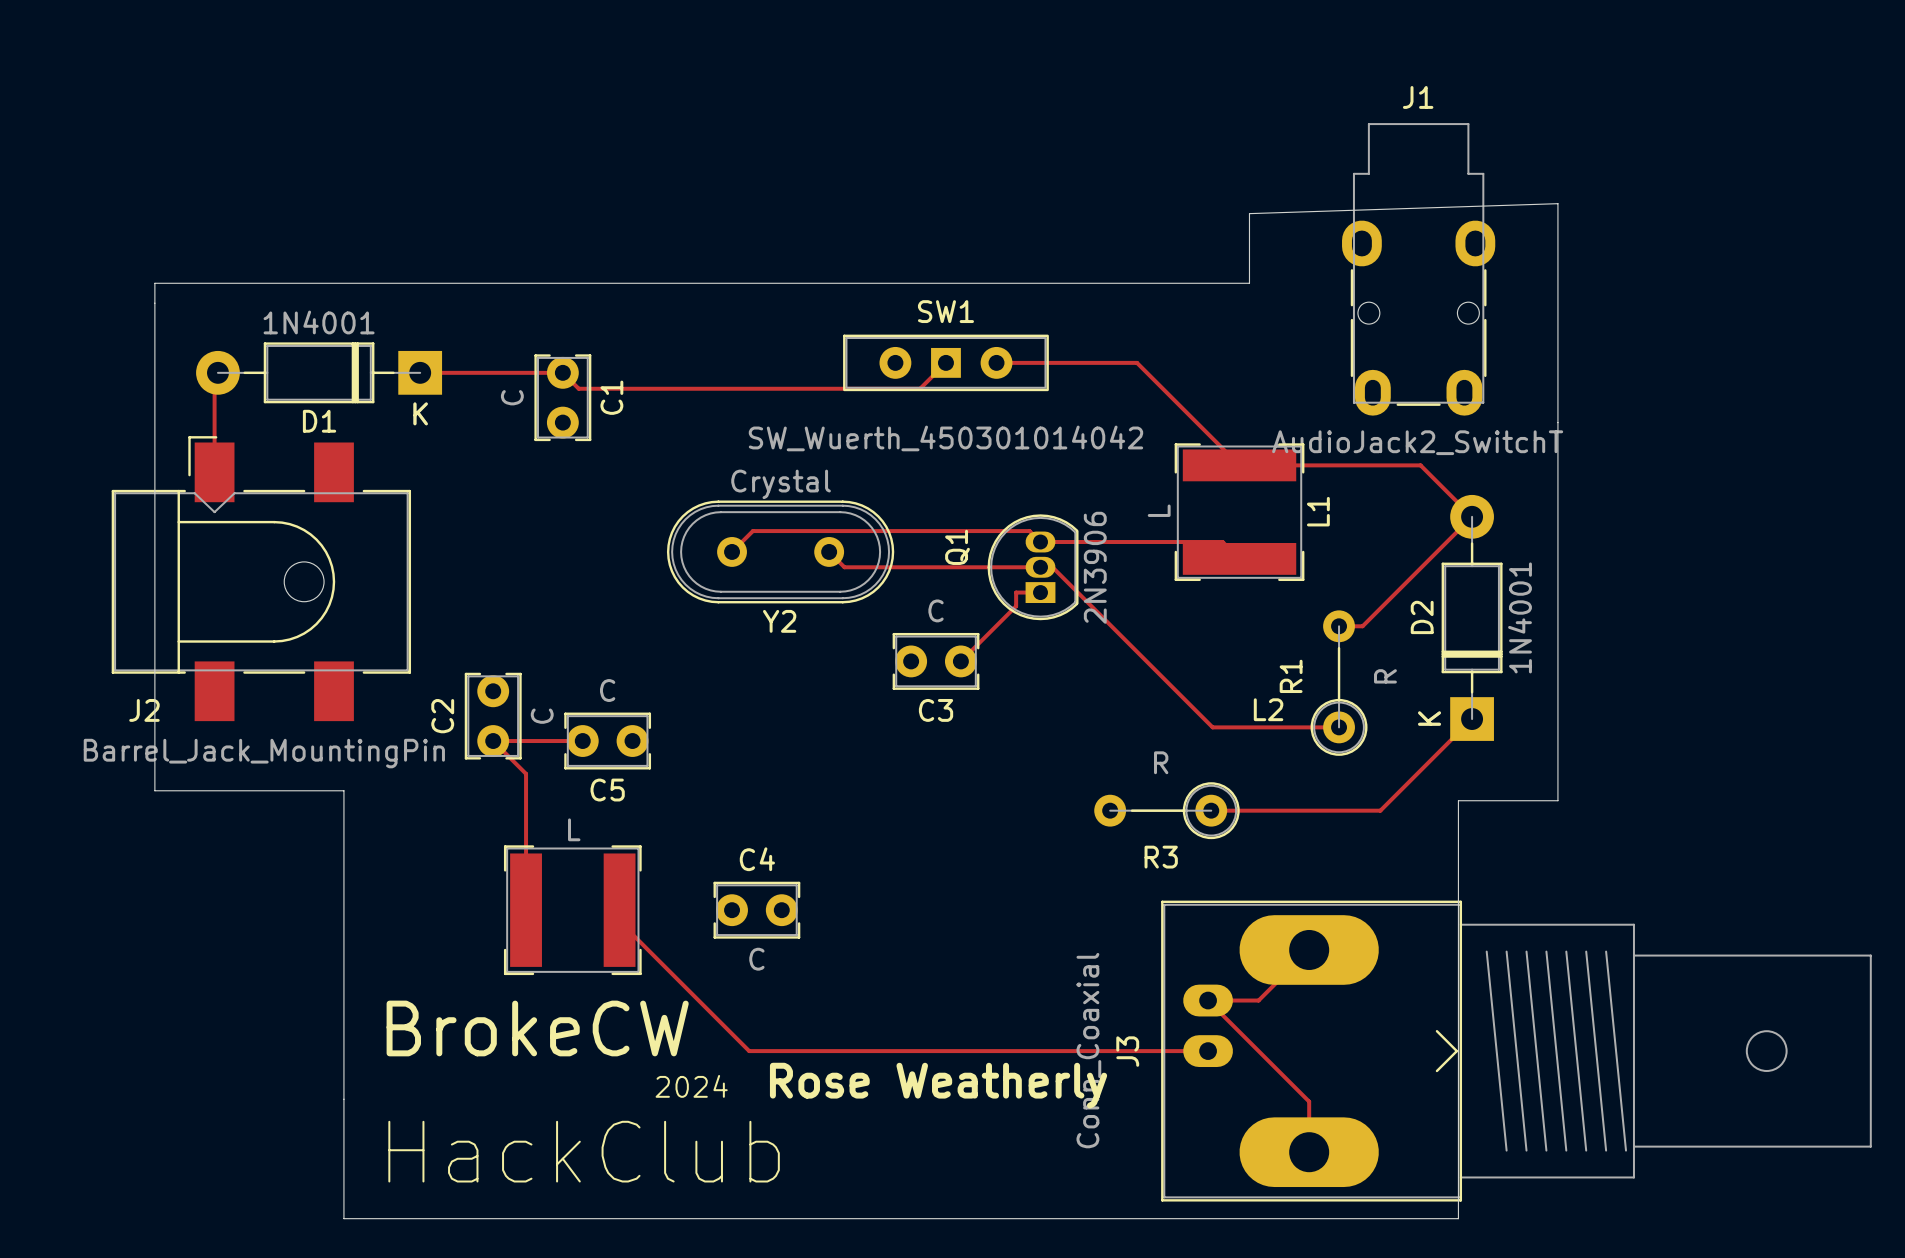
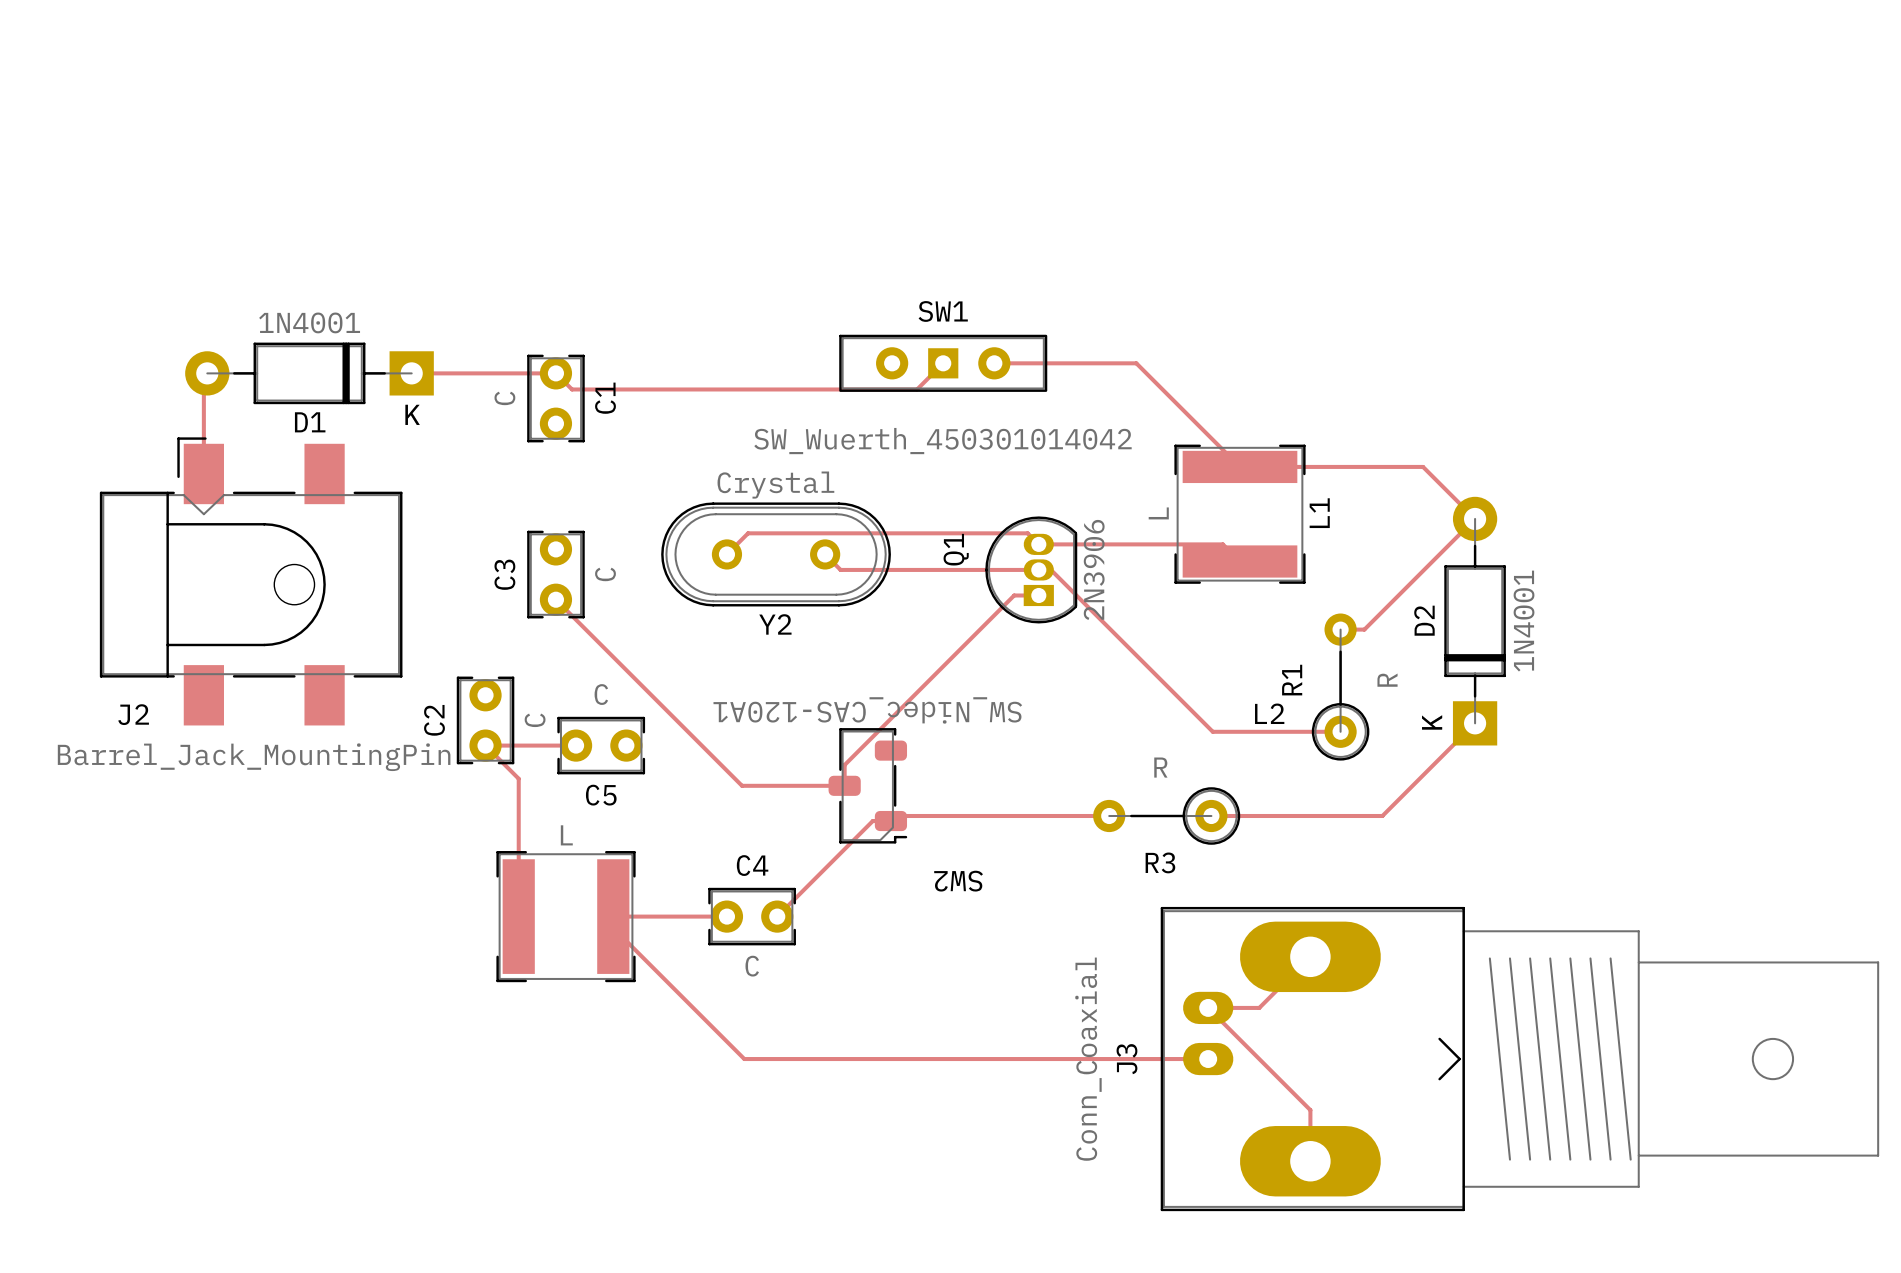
board edge: (1557, 203) (1557, 800) (1458, 800) (1458, 1218) (343, 1218) (343, 790) (154, 790) (154, 283) (1249, 283) (1249, 213) (1557, 203) -> none
J1: AudioJack2_SwitchT (1418, 269) -> none
track: (1016, 592) (1016, 606) (960, 661) -> (1014, 595) (844, 765) (844, 785) (742, 785) (555, 599)
C3 rotation: 0° (936, 661) -> 90° clockwise (555, 574)
C3 position: (936, 661) -> (555, 574)
SW2: none -> SW_Nidec_CAS-120A1 (867, 785)
track: none -> (1109, 815) (895, 815) (890, 821) (872, 821) (777, 916) (767, 916)
track: none -> (613, 916) (726, 916)
text: BrokeCW (537, 1028) -> none
text: Rose Weatherly (938, 1085) -> none
text: 2024 (691, 1086) -> none
text: HackClub (584, 1151) -> none

